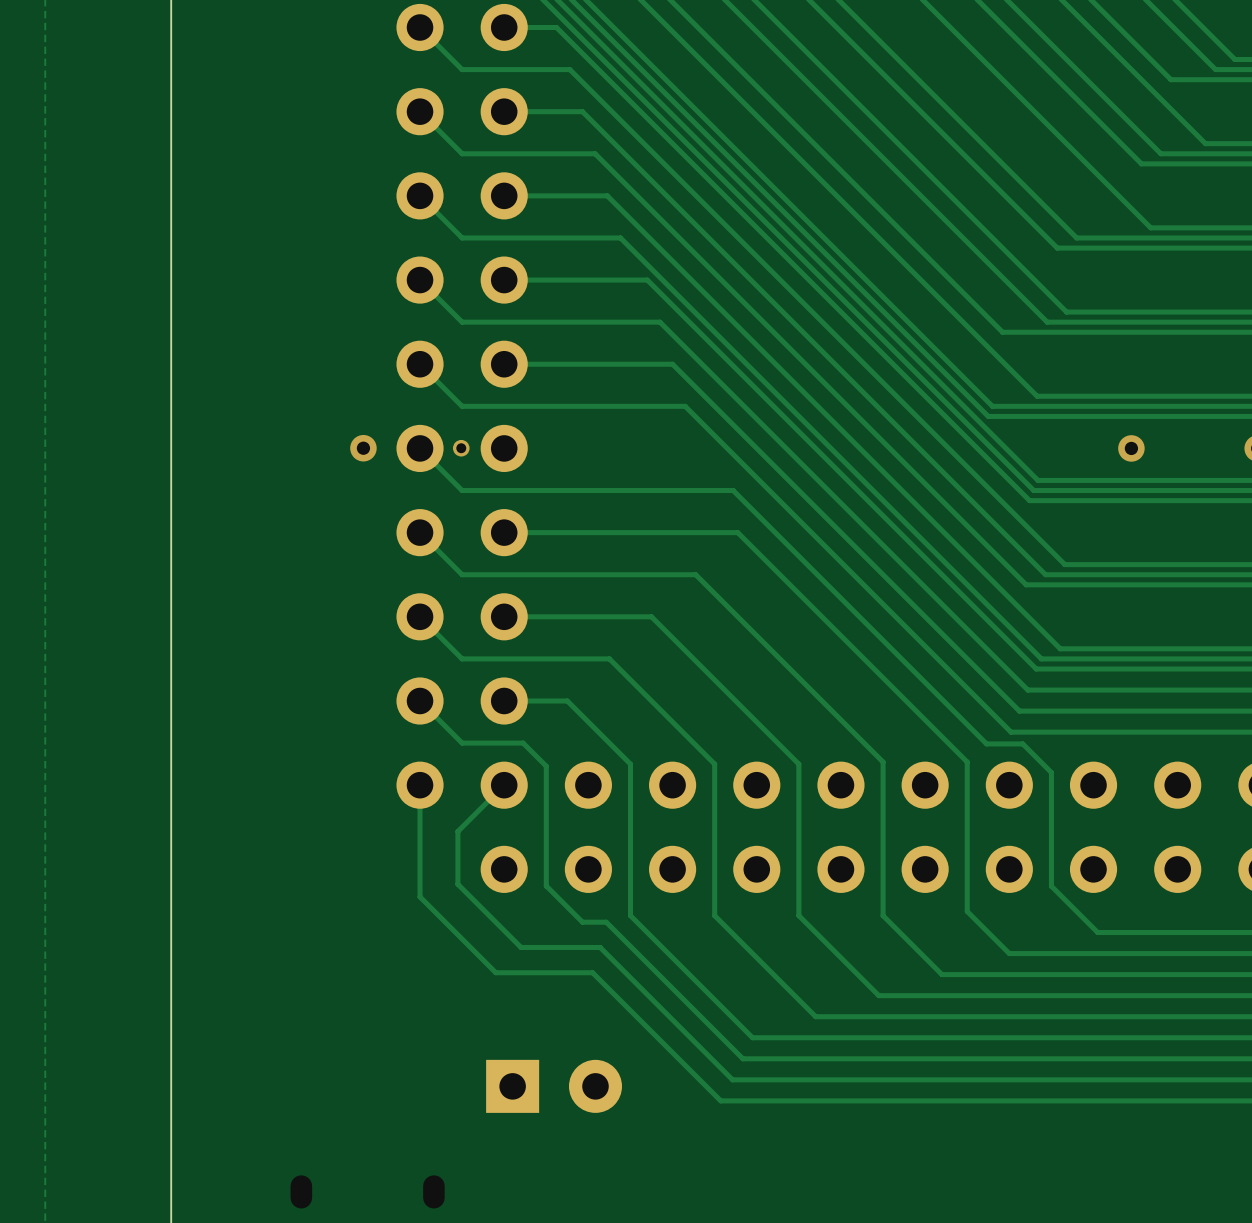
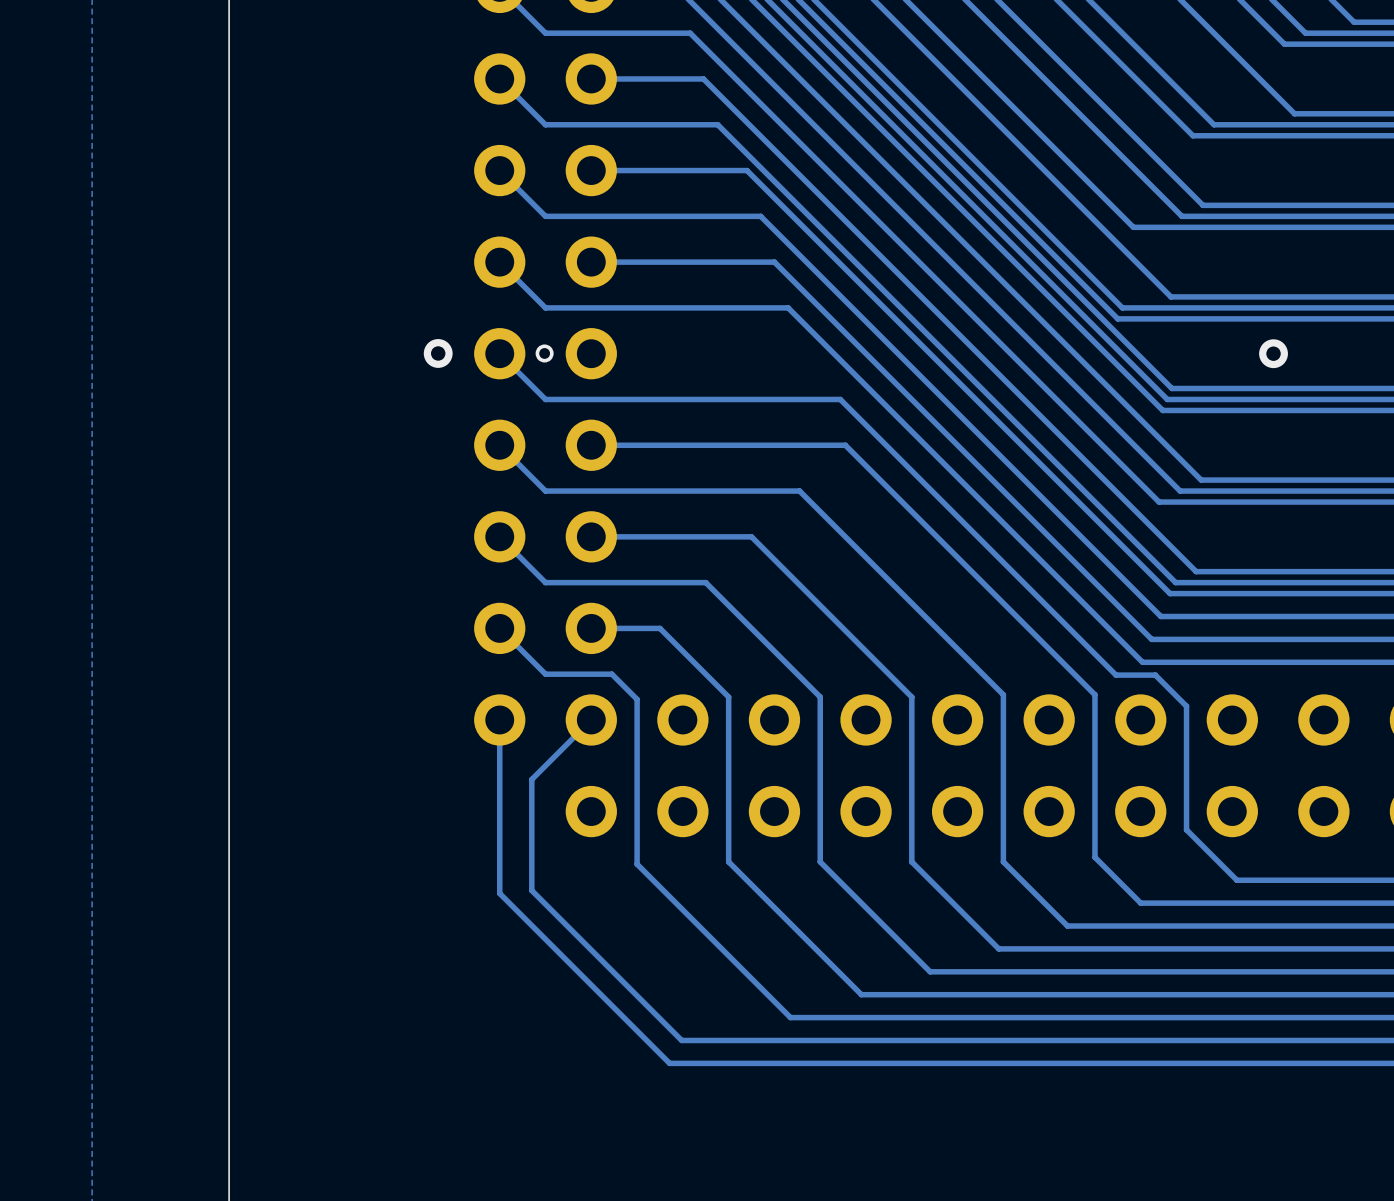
track: (457, 831) (457, 884) (521, 947) (600, 947) (732, 1079) -> (540, 770) (531, 779) (531, 890) (681, 1040) (839, 1040)
track: (546, 886) (582, 922) (606, 922) (742, 1058) -> (637, 829) (637, 864) (790, 1017) (850, 1017)
track: (420, 896) (495, 972) (592, 972) (720, 1100) -> (499, 841) (499, 893) (669, 1063) (826, 1063)
part: (554, 1086) -> none

